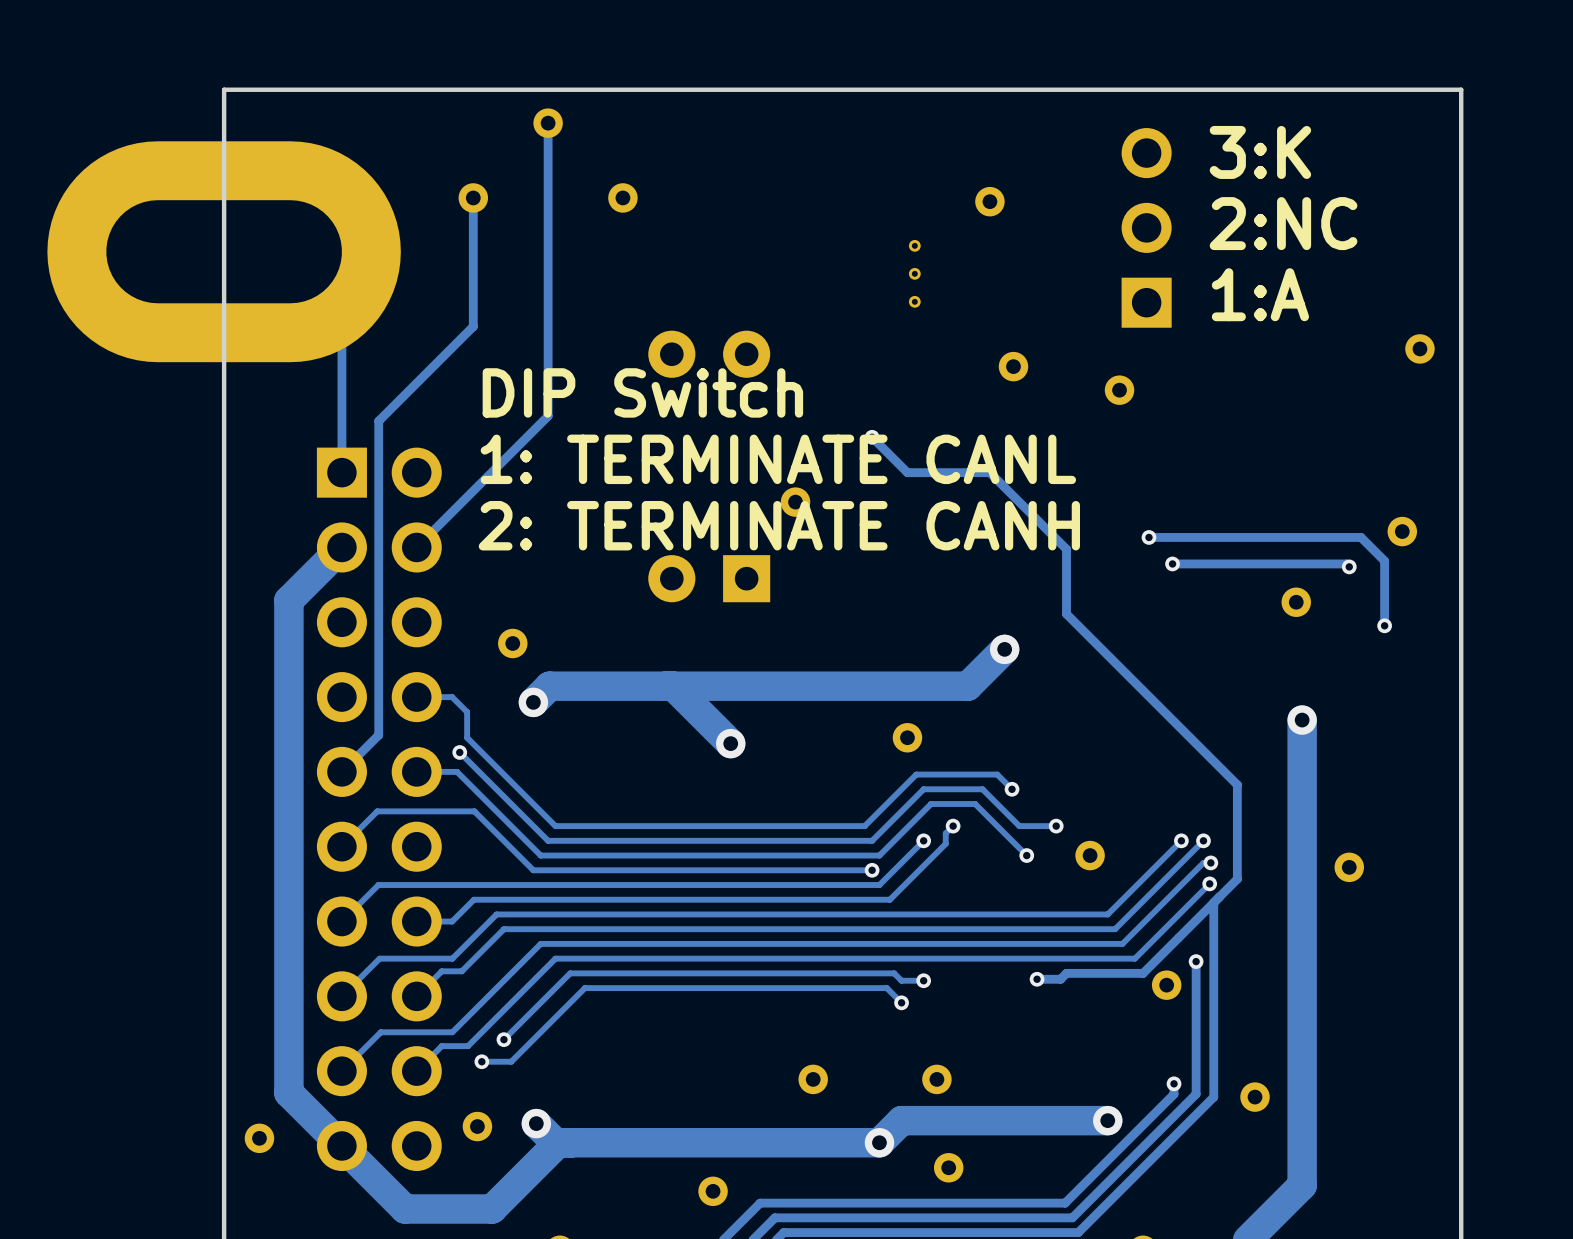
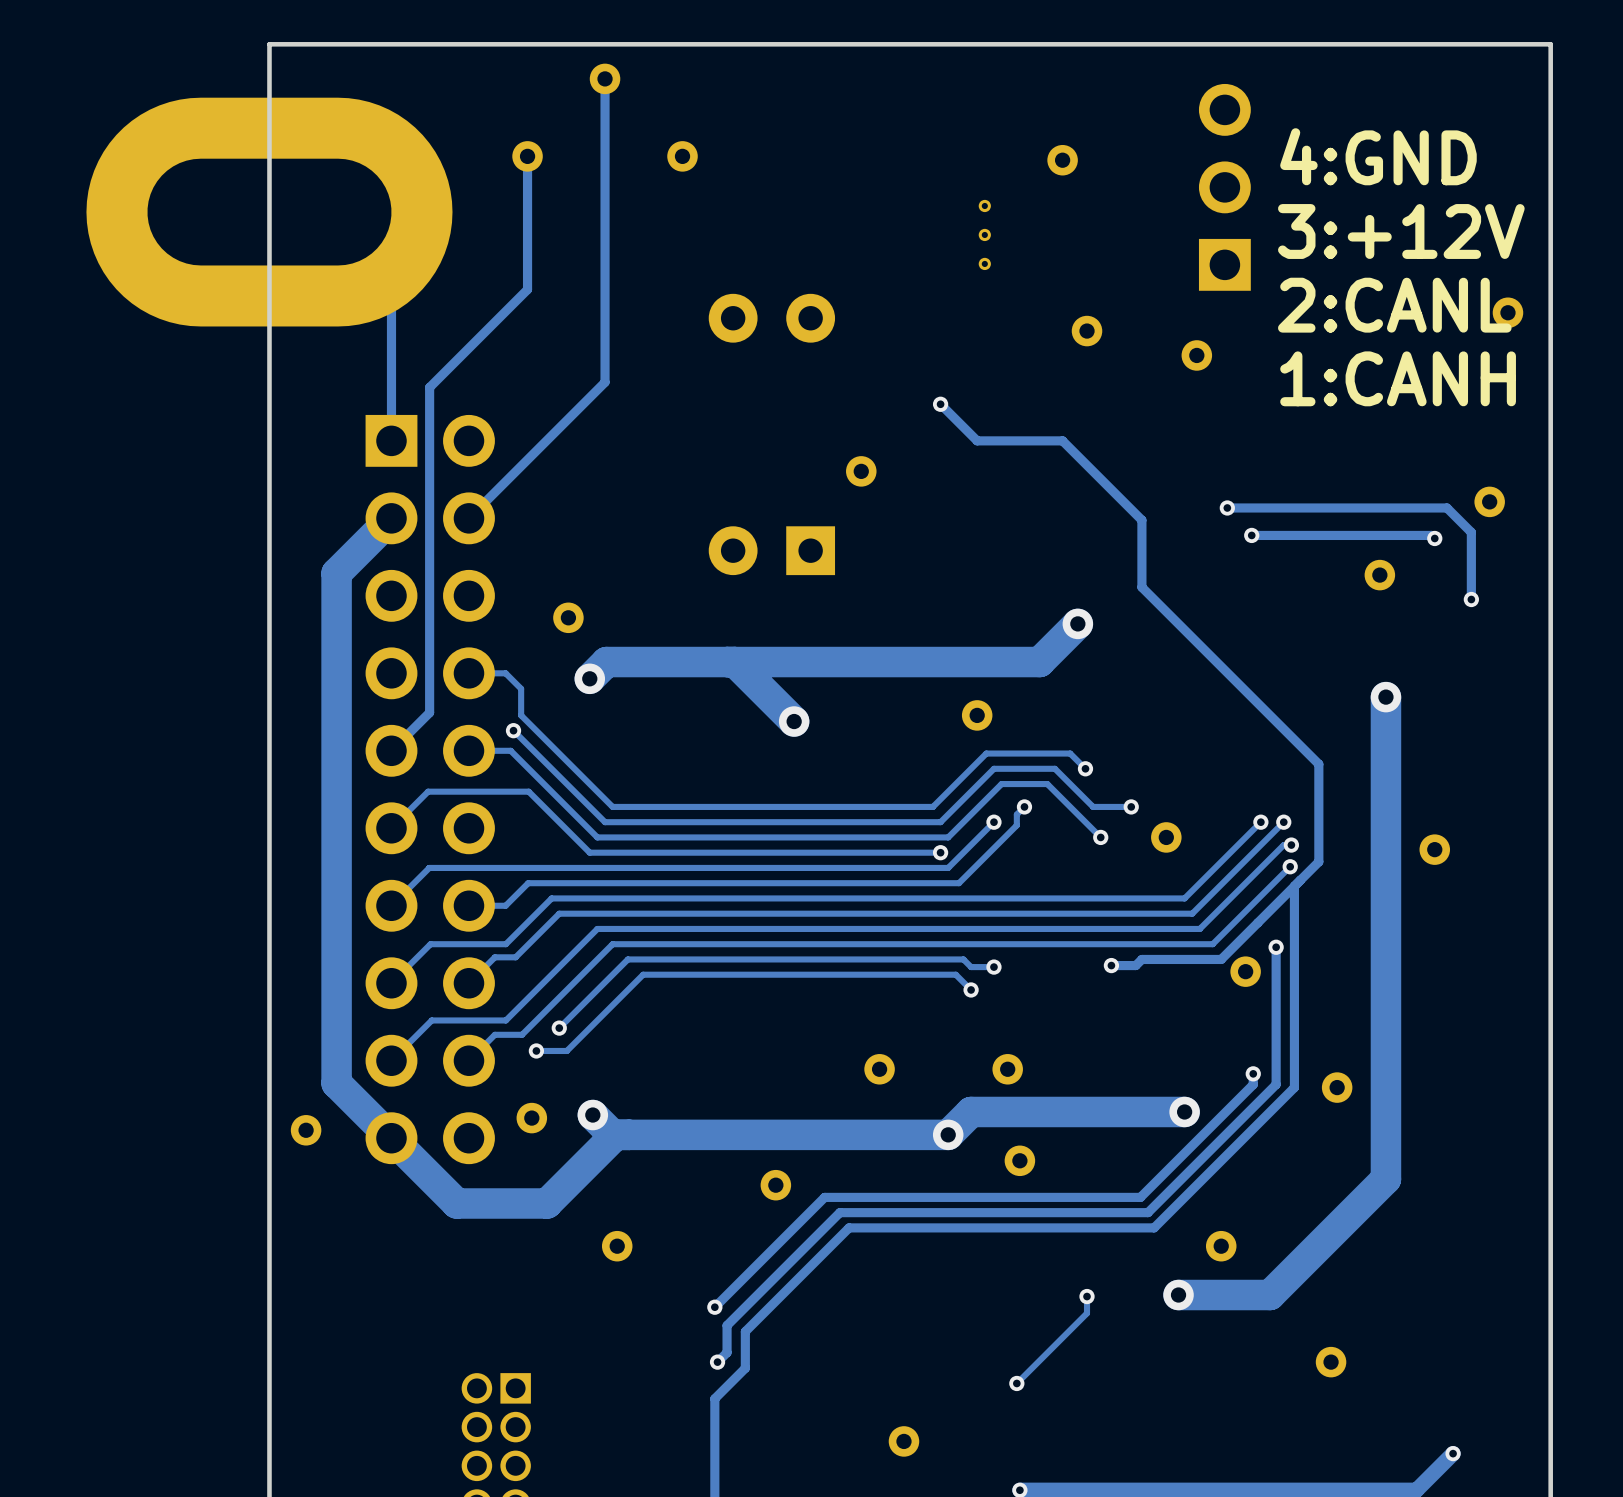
text: 3:K (1260, 152) -> none
text: none -> 4:GND (1378, 156)
text: 2:NC (1283, 223) -> none
text: none -> 3:+12V (1401, 231)
text: 1:A (1260, 294) -> none
text: none -> 2:CANL (1394, 305)
text: DIP Switch (642, 392) -> none
text: none -> 1:CANH (1398, 378)
text: 1: TERMINATE CANL (778, 459) -> none
text: 2: TERMINATE CANH (779, 525) -> none

